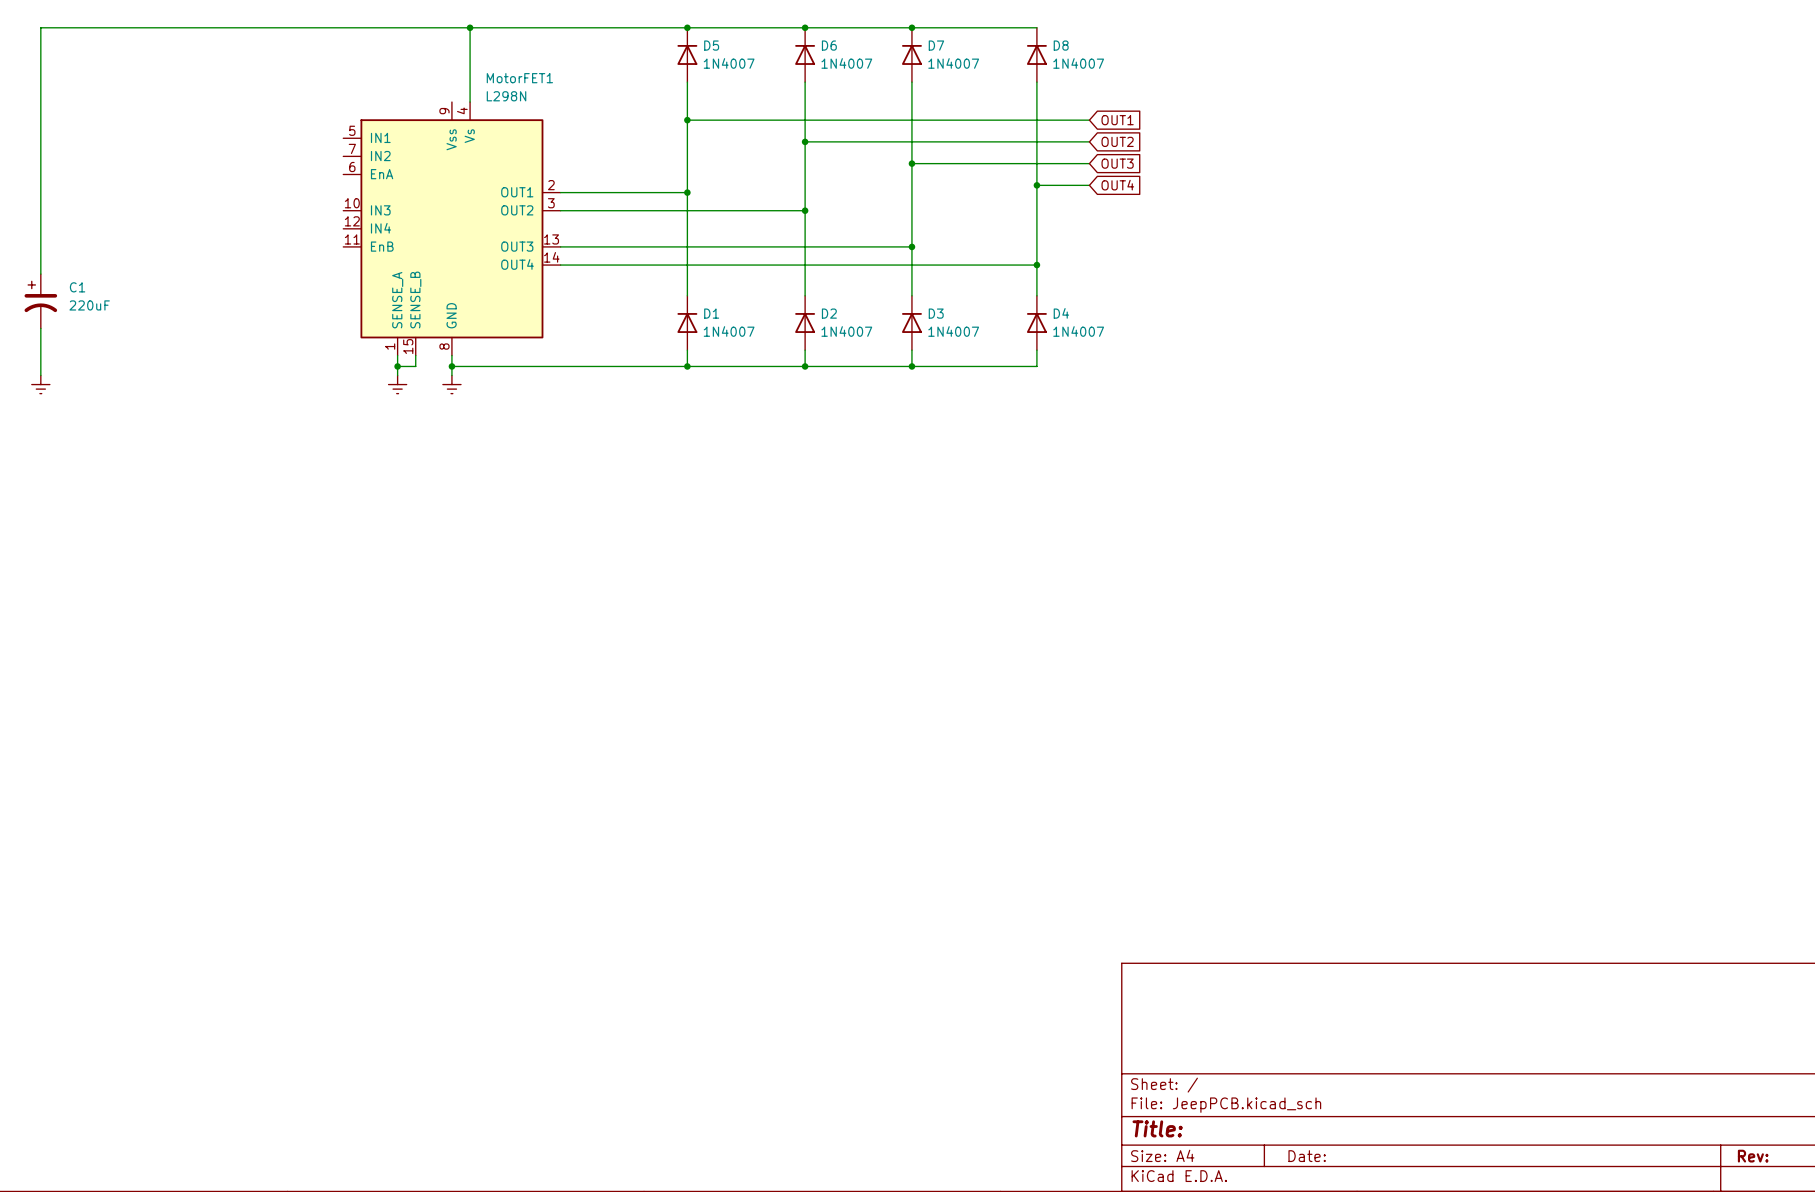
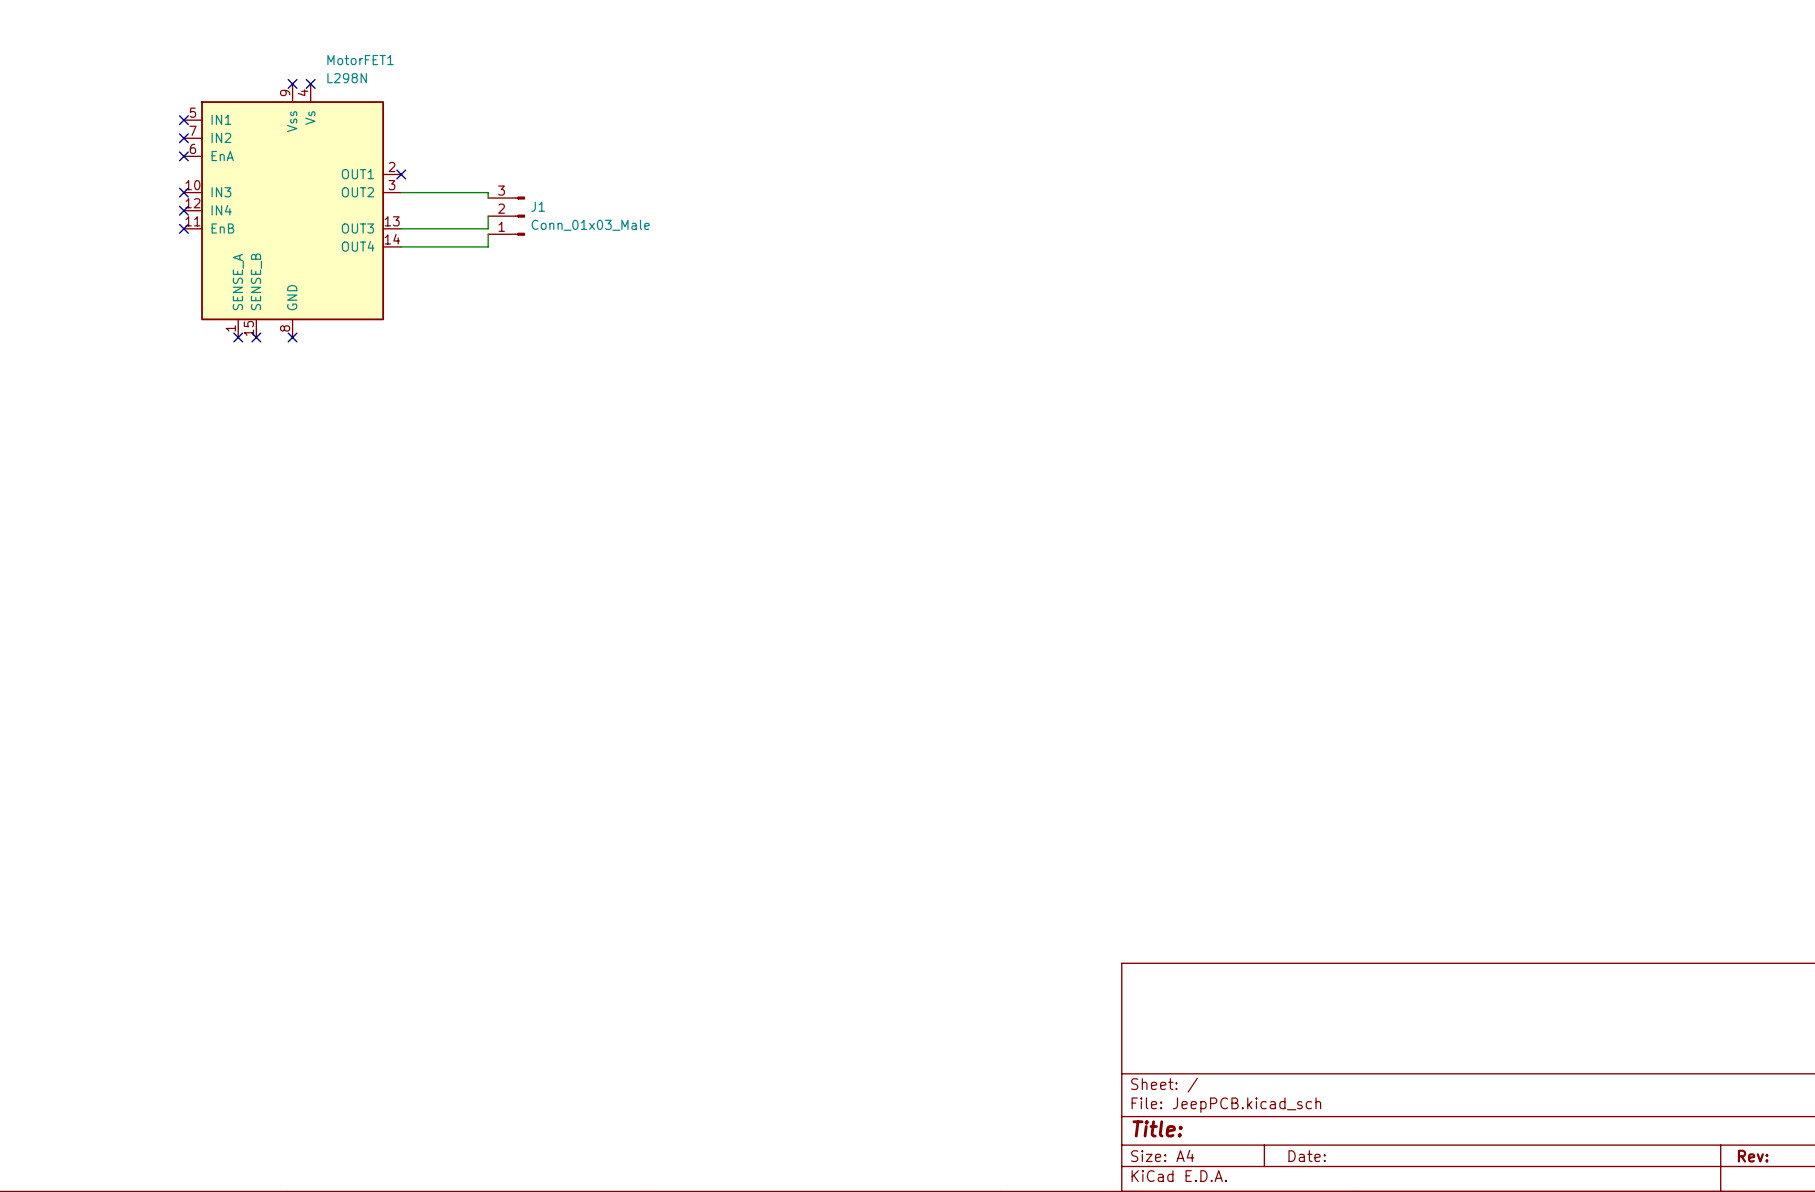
wire: (470, 27) (470, 102) -> none
junction: (470, 27) -> none
junction: (687, 27) -> none
junction: (805, 27) -> none
junction: (911, 27) -> none
wire: (1036, 27) (40, 27) (40, 274) -> none
D5: 1N4007 (687, 54) -> none
D6: 1N4007 (805, 54) -> none
D7: 1N4007 (911, 54) -> none
D8: 1N4007 (1036, 54) -> none
wire: (687, 82) (687, 295) -> none
wire: (805, 82) (805, 295) -> none
wire: (911, 82) (911, 295) -> none
wire: (1036, 82) (1036, 295) -> none
no-connect mark: none -> (292, 83)
no-connect mark: none -> (310, 83)
no-connect mark: none -> (183, 120)
wire: (687, 120) (1089, 120) -> none
junction: (687, 120) -> none
global label: OUT1 (1117, 120) -> none
no-connect mark: none -> (183, 138)
wire: (805, 141) (1089, 141) -> none
junction: (805, 141) -> none
global label: OUT2 (1117, 141) -> none
no-connect mark: none -> (183, 156)
wire: (911, 163) (1089, 163) -> none
junction: (911, 163) -> none
global label: OUT3 (1117, 163) -> none
no-connect mark: none -> (401, 174)
wire: (1036, 185) (1089, 185) -> none
junction: (1036, 185) -> none
global label: OUT4 (1117, 185) -> none
no-connect mark: none -> (183, 192)
wire: (560, 192) (687, 192) -> none
junction: (687, 192) -> none
no-connect mark: none -> (183, 210)
wire: (560, 210) (805, 210) -> none
junction: (805, 210) -> none
J1: none -> Conn_01x03_Male (506, 216)
no-connect mark: none -> (183, 228)
MotorFET1 position: (451, 228) -> (292, 210)
wire: (560, 246) (911, 246) -> none
junction: (911, 246) -> none
wire: (560, 265) (1036, 265) -> none
junction: (1036, 265) -> none
C1: 220uF (40, 301) -> none
D1: 1N4007 (687, 322) -> none
D2: 1N4007 (805, 322) -> none
D3: 1N4007 (911, 322) -> none
D4: 1N4007 (1036, 322) -> none
wire: (40, 328) (40, 375) -> none
no-connect mark: none -> (238, 337)
no-connect mark: none -> (256, 337)
no-connect mark: none -> (292, 337)
wire: (687, 350) (687, 366) -> none
wire: (805, 350) (805, 366) -> none
wire: (911, 350) (911, 366) -> none
wire: (1036, 350) (1036, 366) (451, 366) -> none
wire: (397, 355) (397, 375) -> none
wire: (415, 355) (415, 366) (397, 366) -> none
wire: (451, 355) (451, 375) -> none
junction: (397, 366) -> none
junction: (451, 366) -> none
junction: (687, 366) -> none
junction: (805, 366) -> none
junction: (911, 366) -> none
power symbol: (40, 384) -> none
power symbol: (397, 384) -> none
power symbol: (451, 384) -> none

